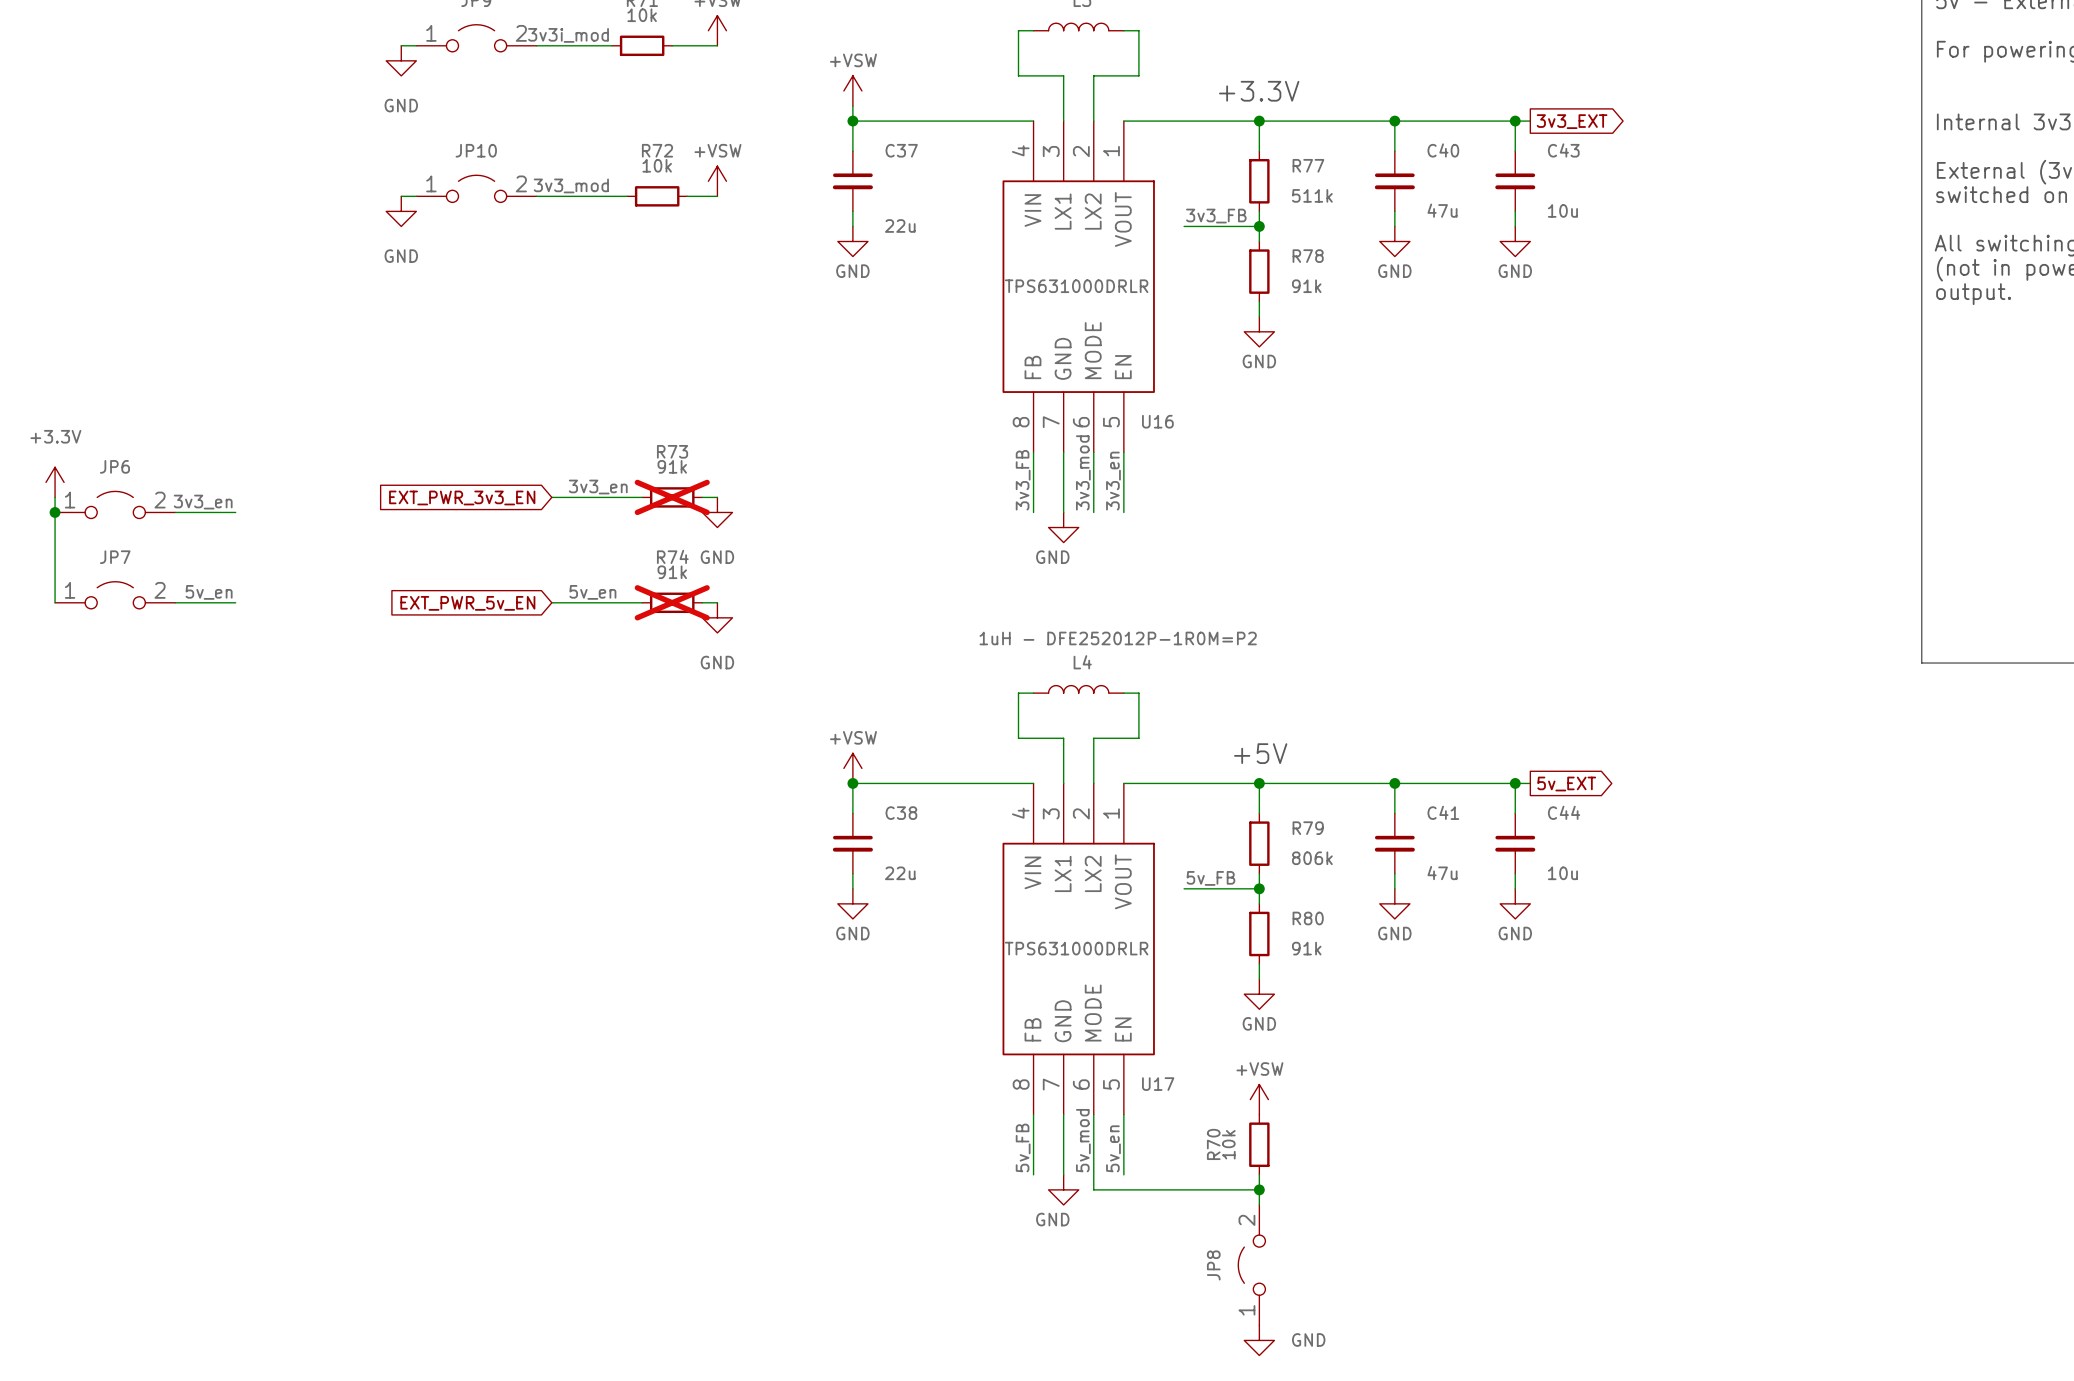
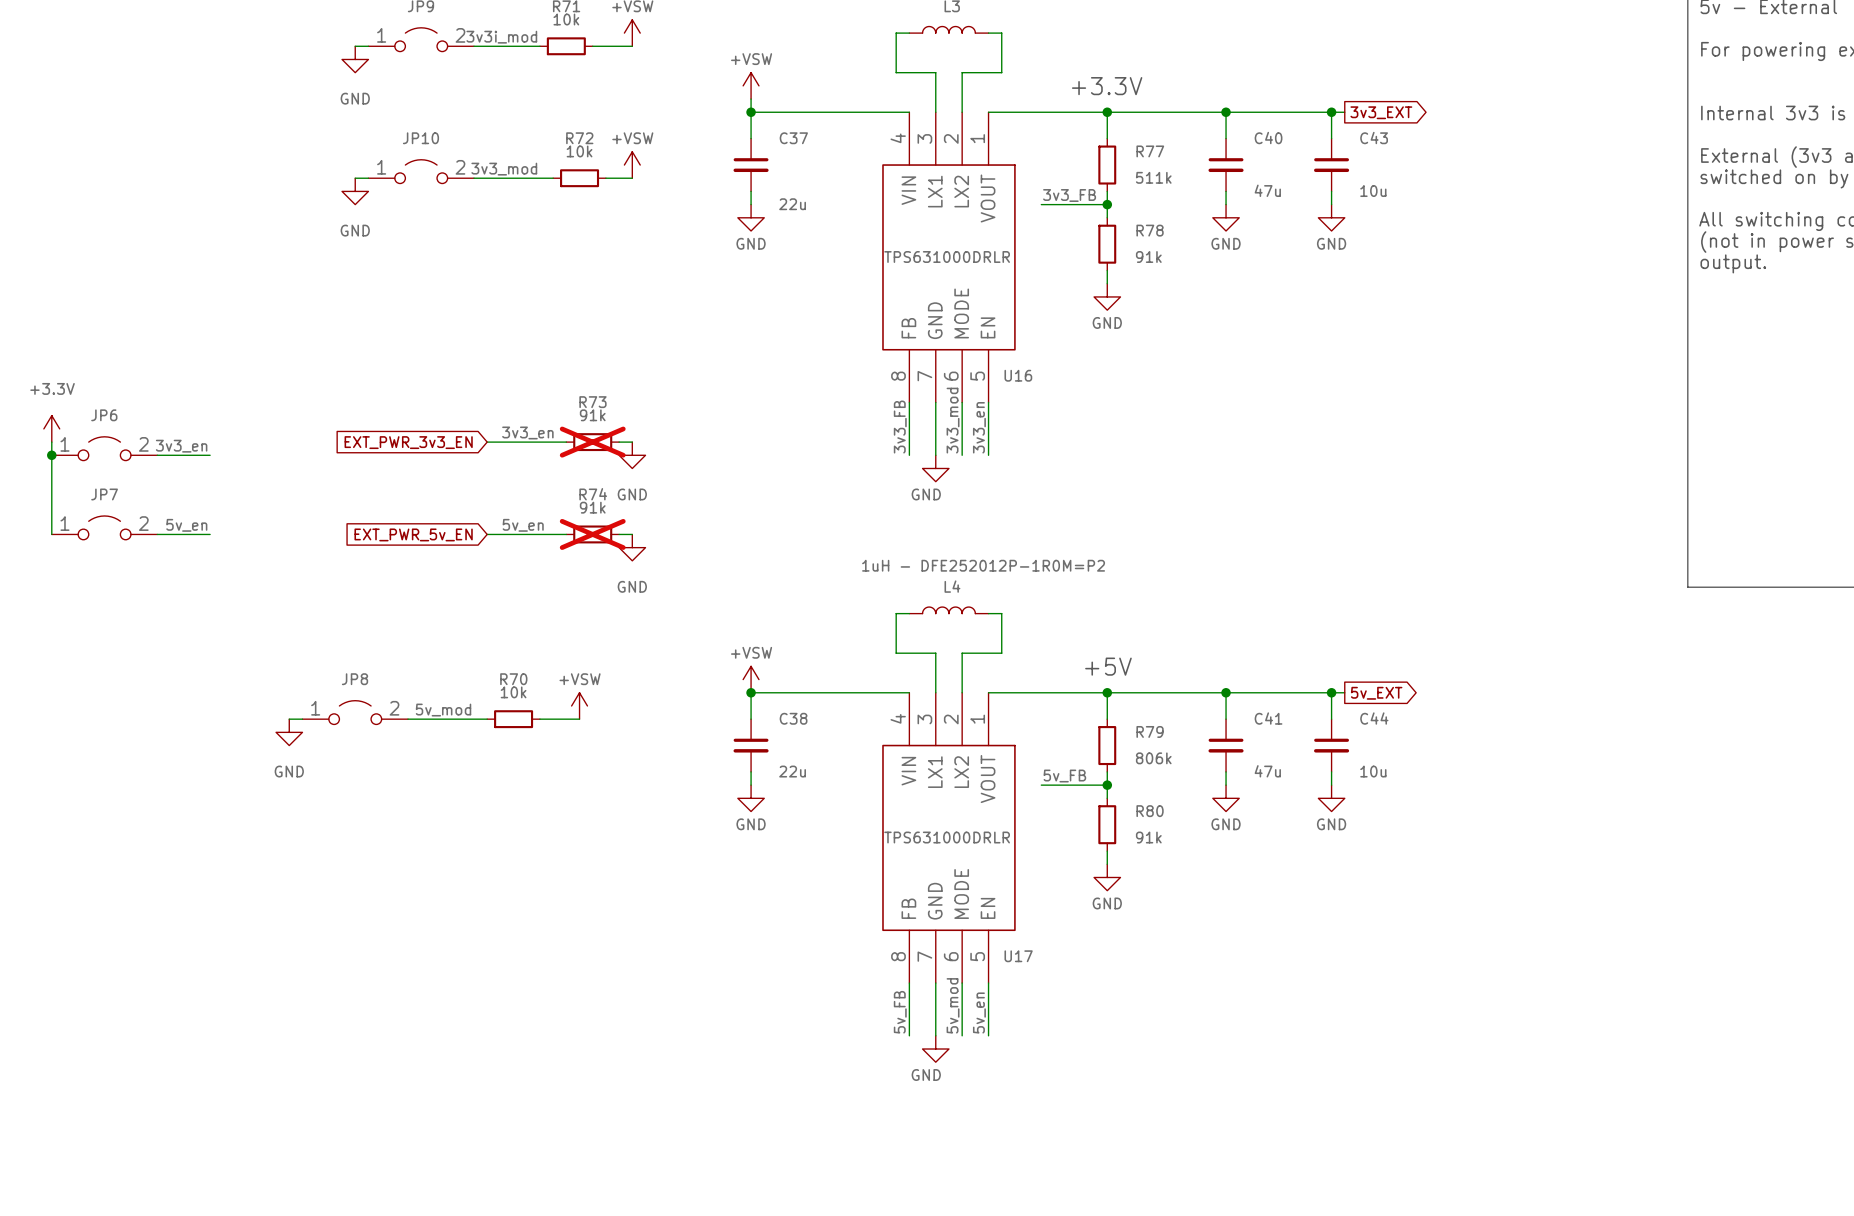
power symbol: none -> +VSW (579, 705)
label: none -> 5v_mod (443, 710)
wire: none -> (289, 719) (302, 719)
wire: none -> (408, 719) (487, 719)
wire: none -> (539, 719) (579, 719)
power symbol: none -> GND (289, 732)
power symbol: +VSW (1259, 1099) -> none
R70 rotation: 0° (1259, 1144) -> 90° clockwise (513, 719)
R70 position: (1259, 1144) -> (513, 719)
wire: (1093, 1174) (1093, 1189) (1259, 1189) -> none
wire: (1259, 1174) (1259, 1204) -> none
junction: (1259, 1189) -> none
JP8 rotation: 0° (1251, 1265) -> 90° clockwise (355, 712)
JP8 position: (1251, 1265) -> (355, 712)
power symbol: GND (1259, 1340) -> none

